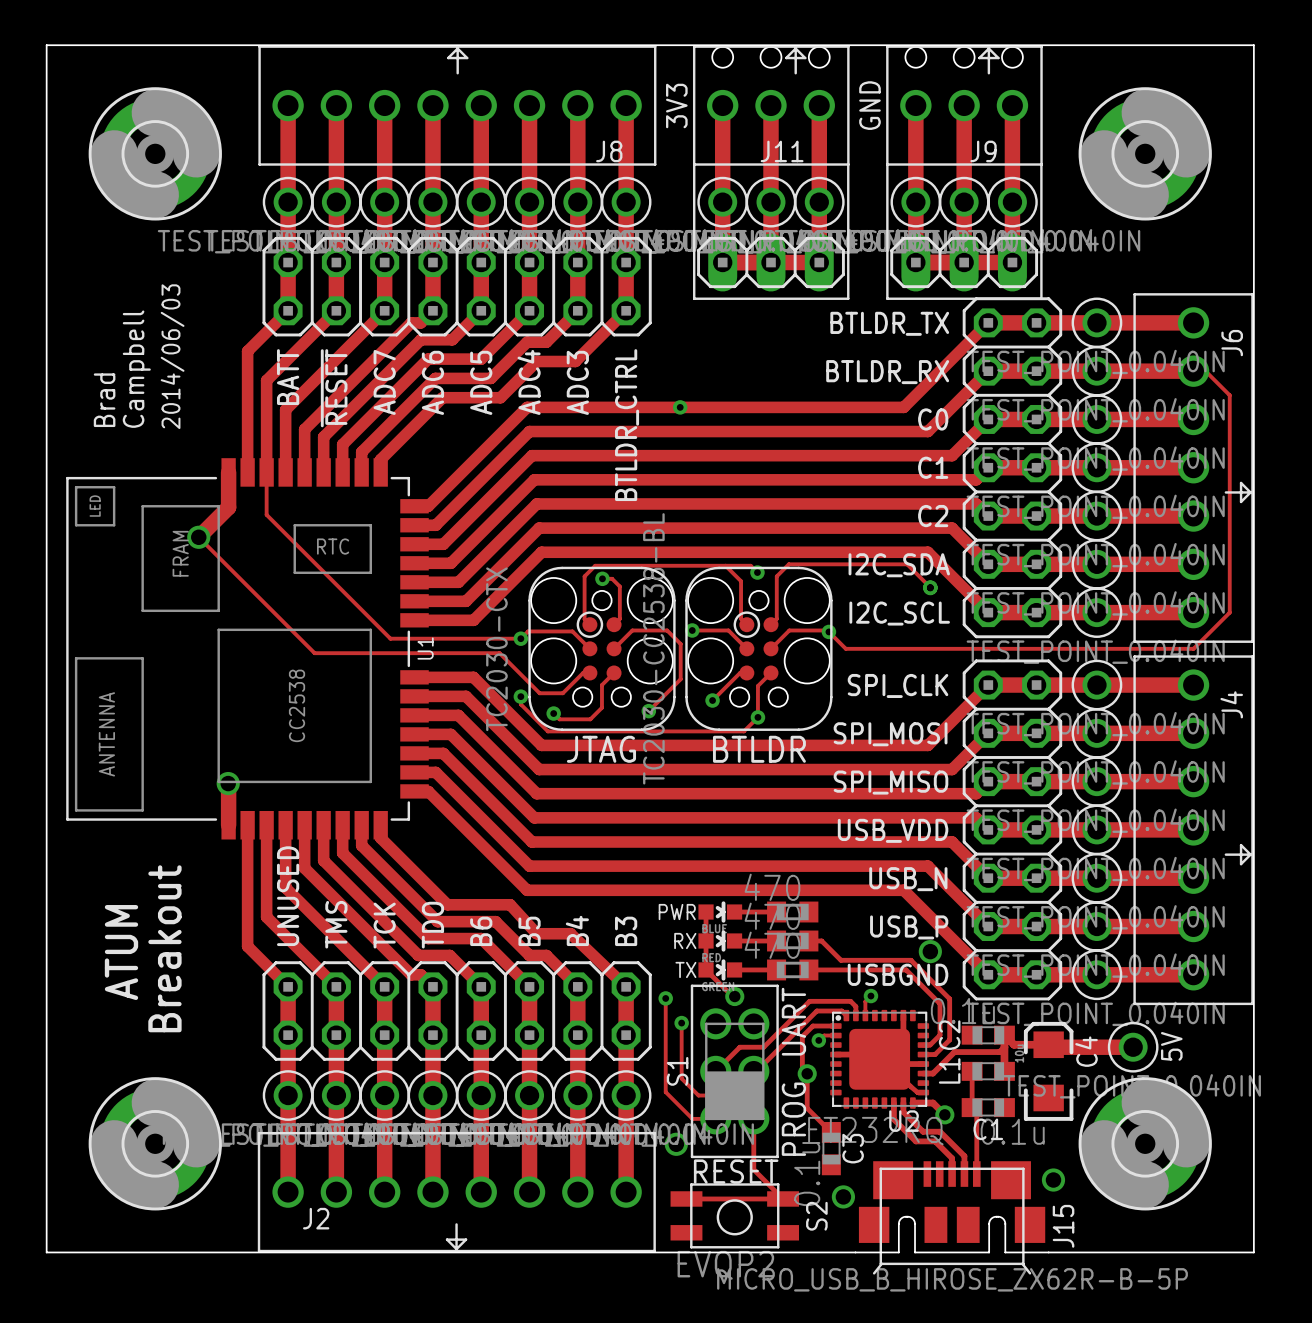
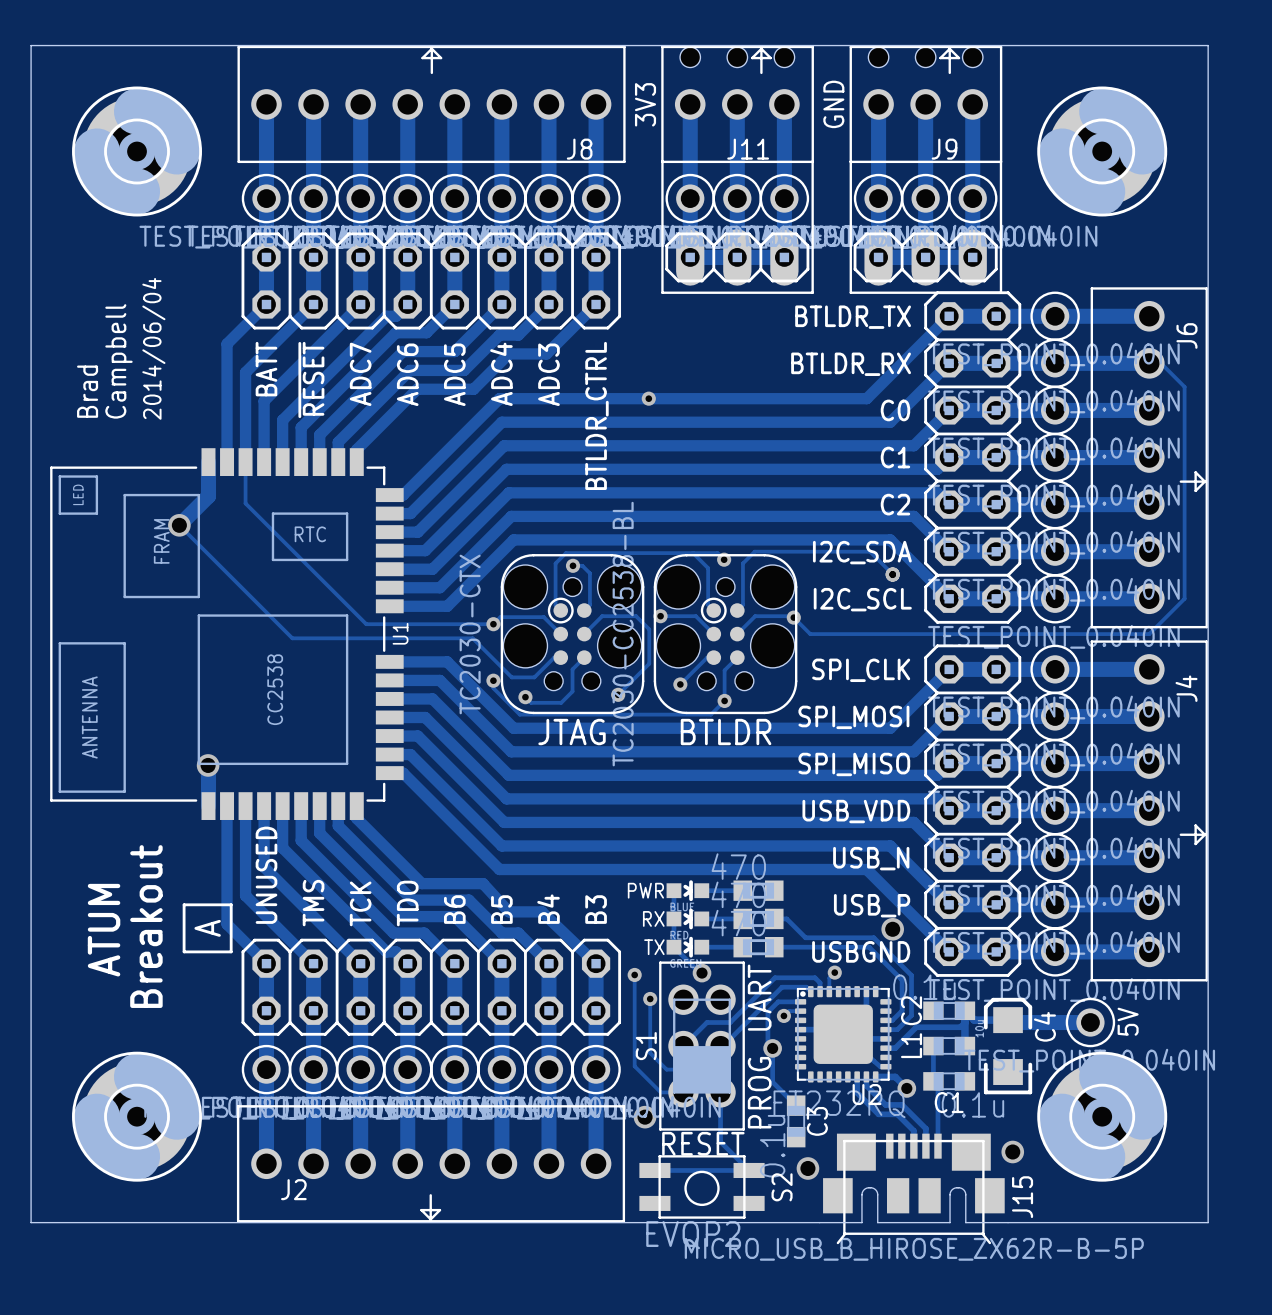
text: 2014/06/03 (172, 356) -> 2014/06/04 (153, 348)
line: none -> (184, 904) (231, 904) (231, 951) (184, 951) (184, 904)
text: none -> A (207, 928)

